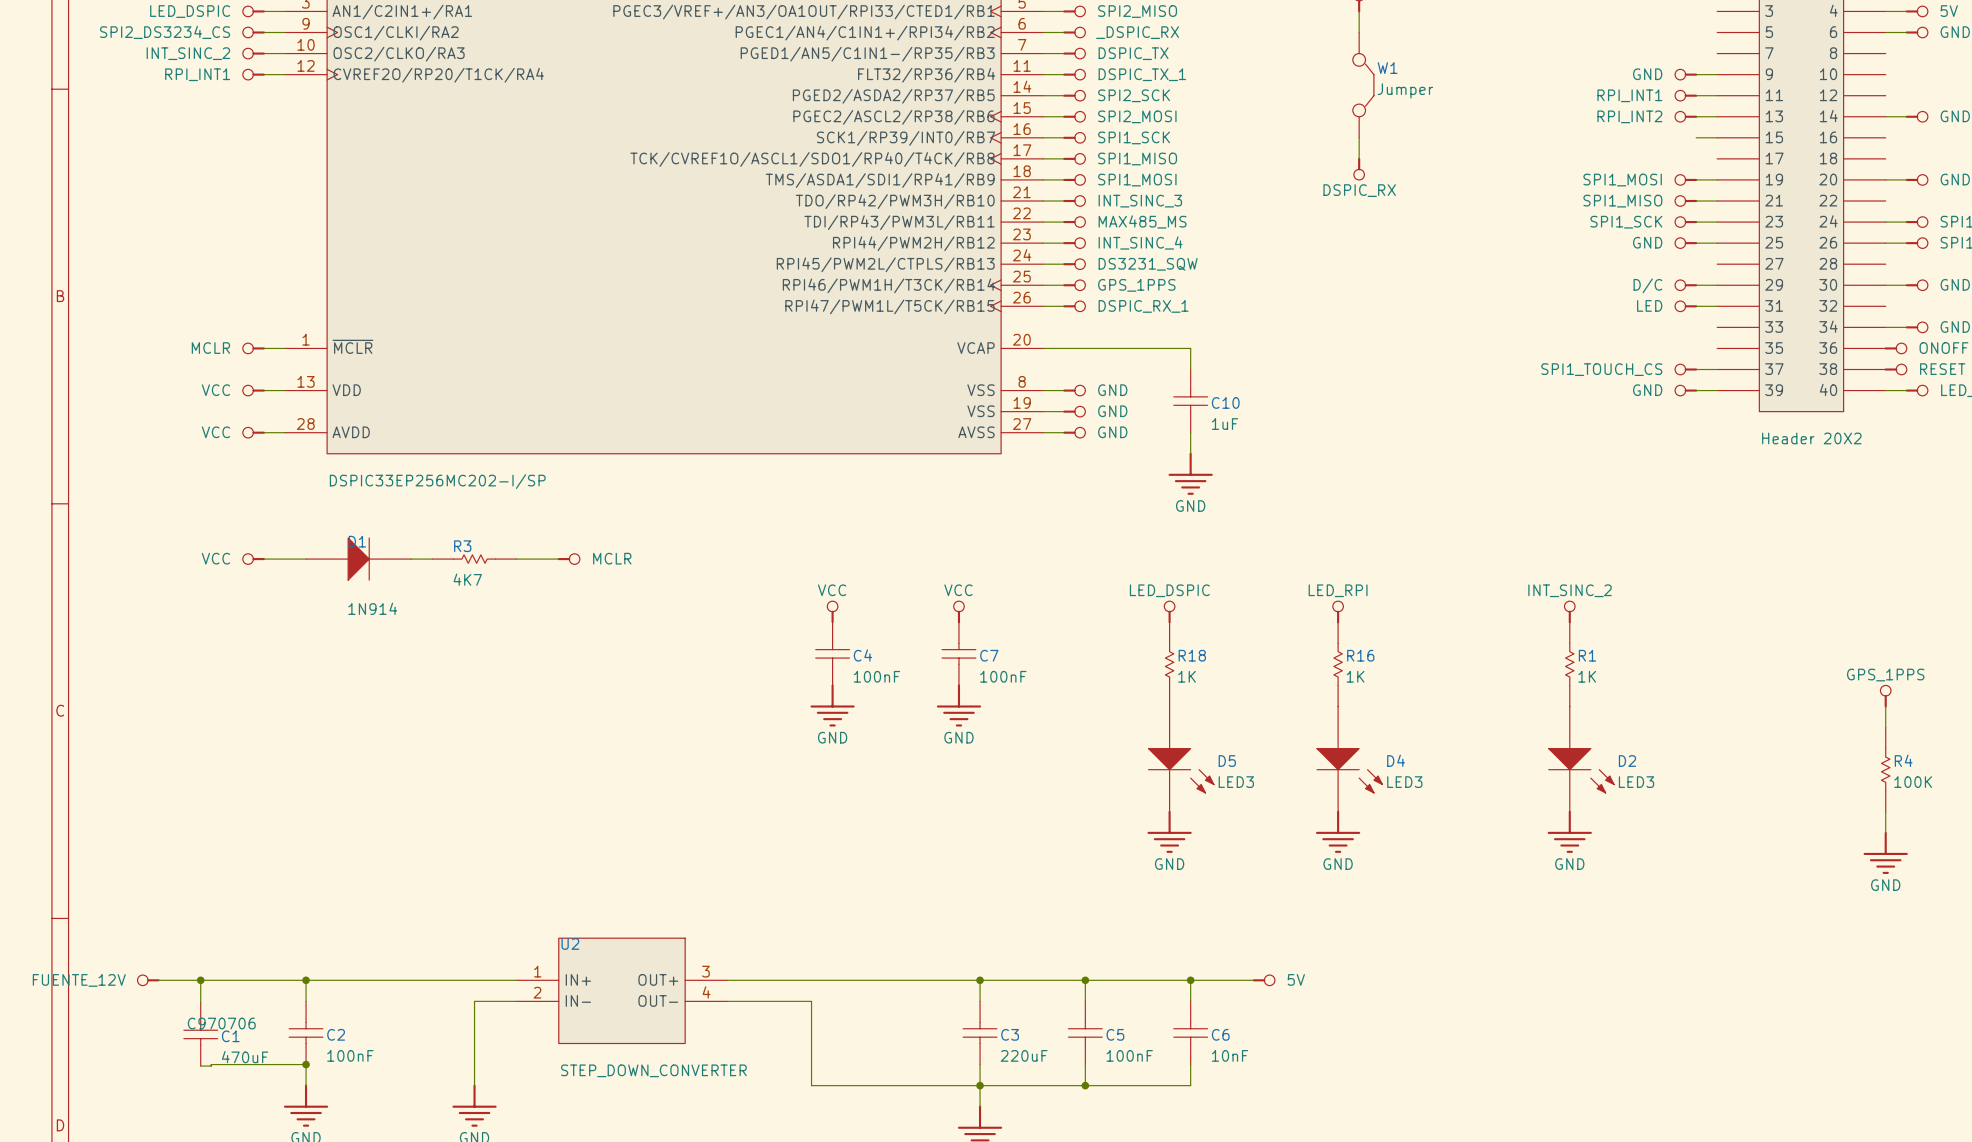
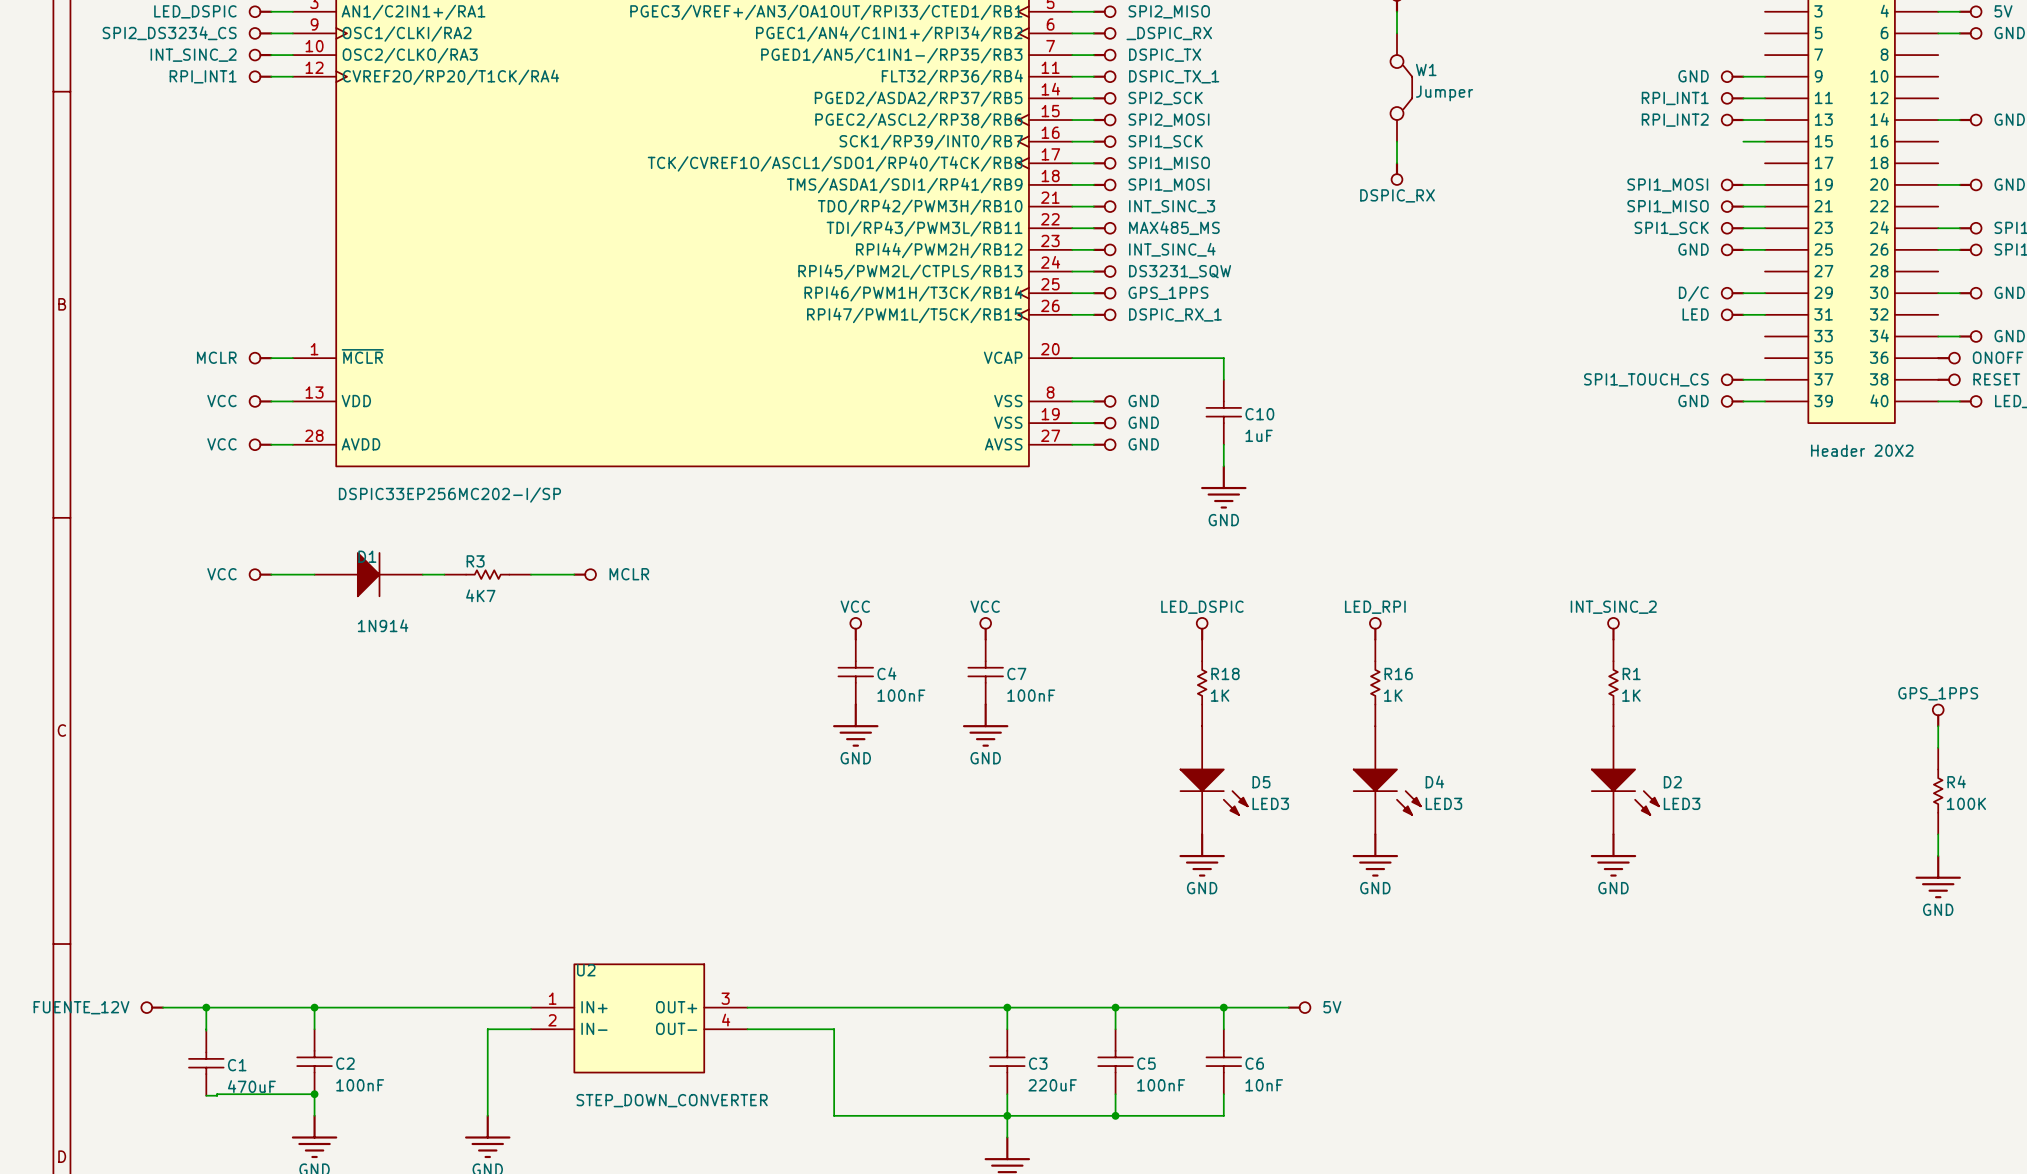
C1 text: C970706 (221, 1023) -> none

